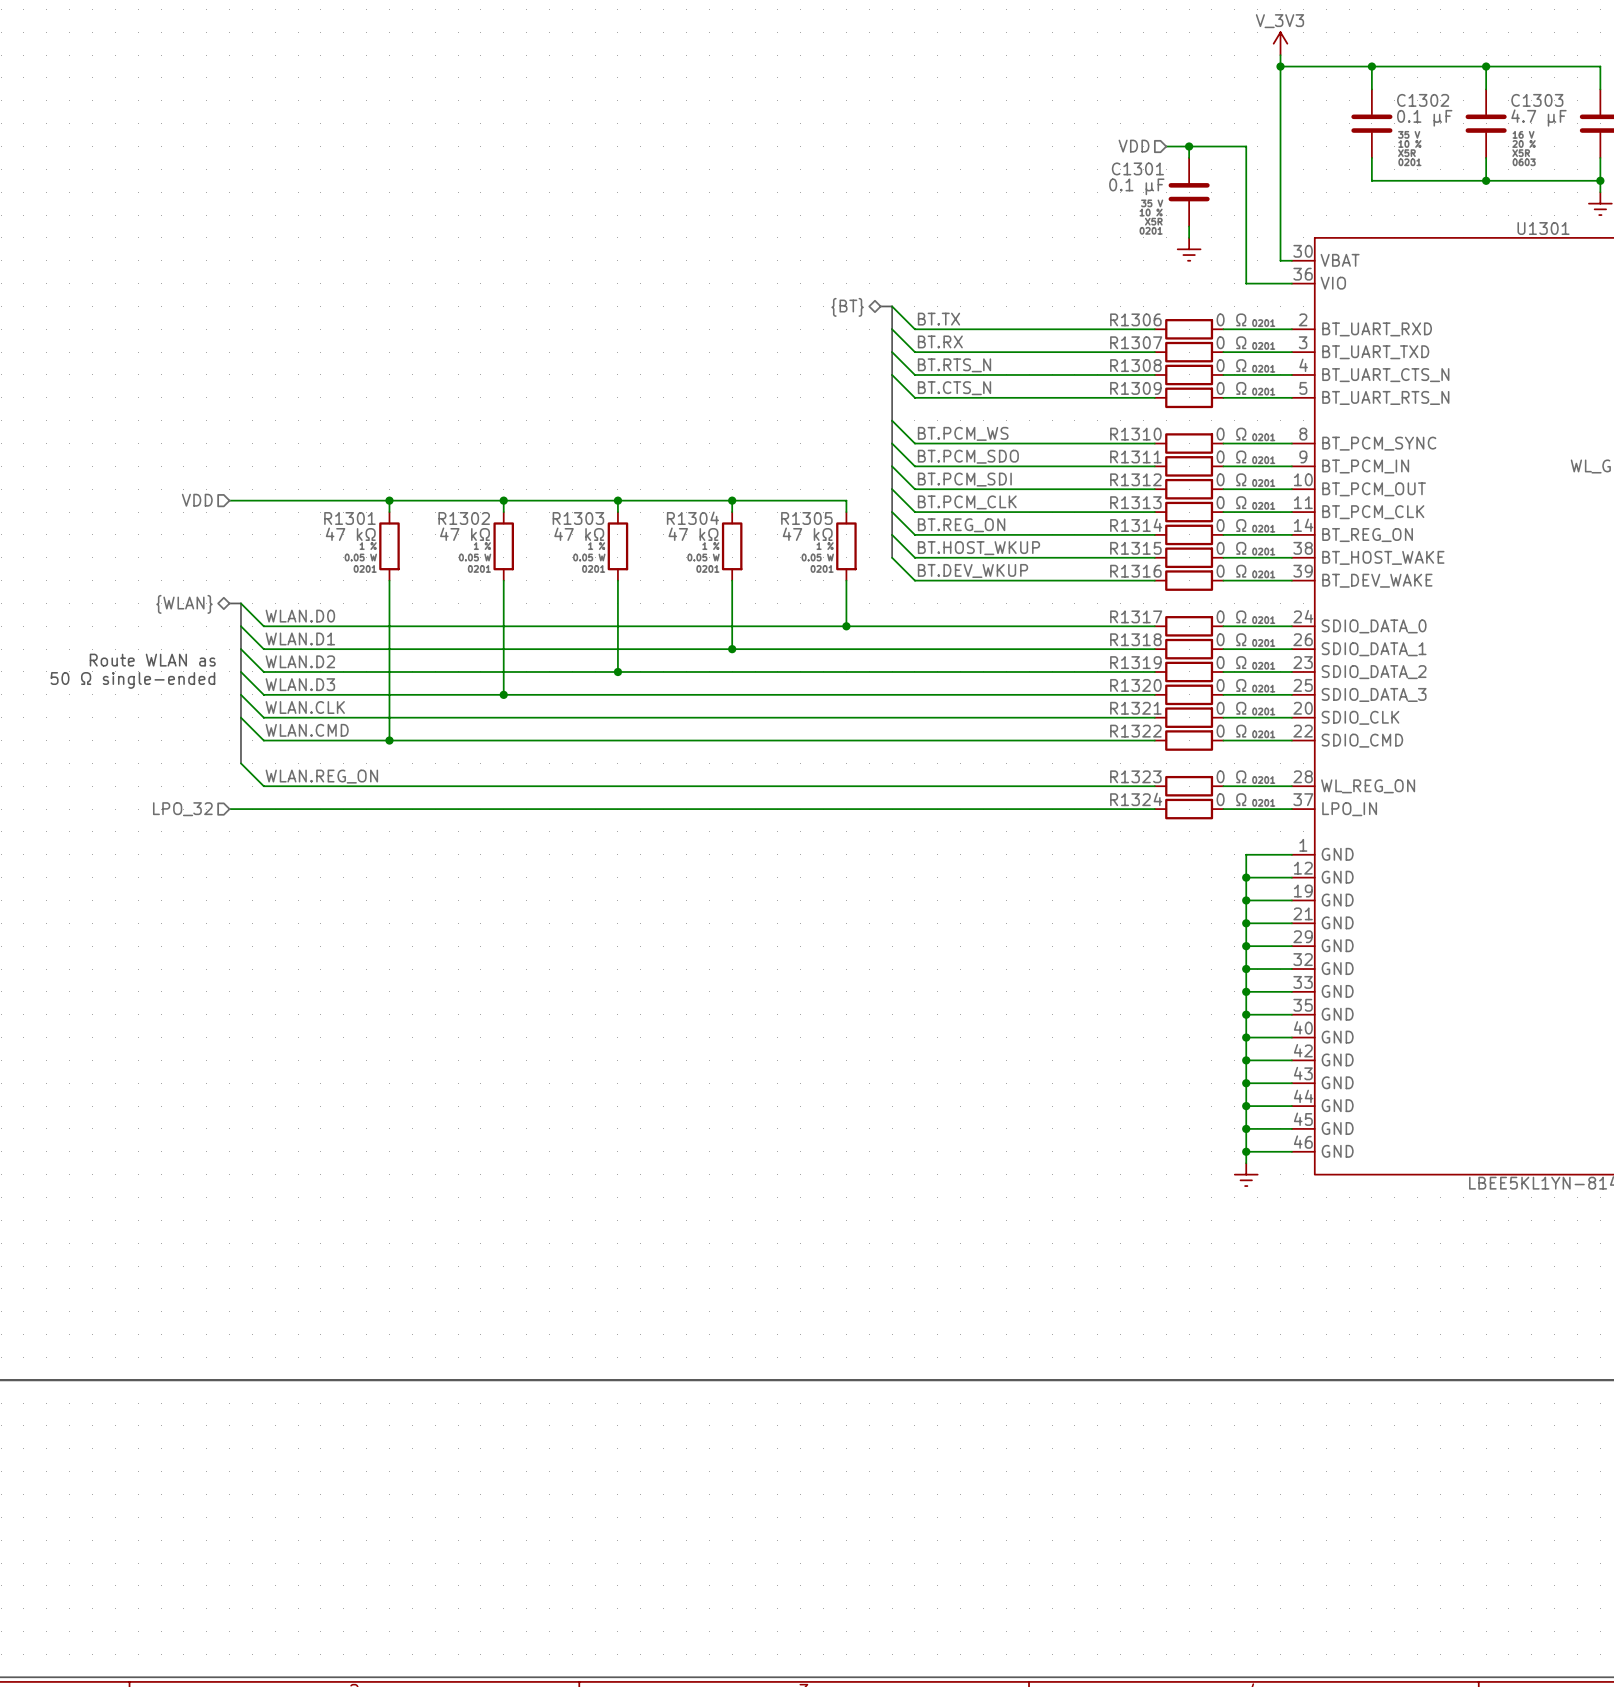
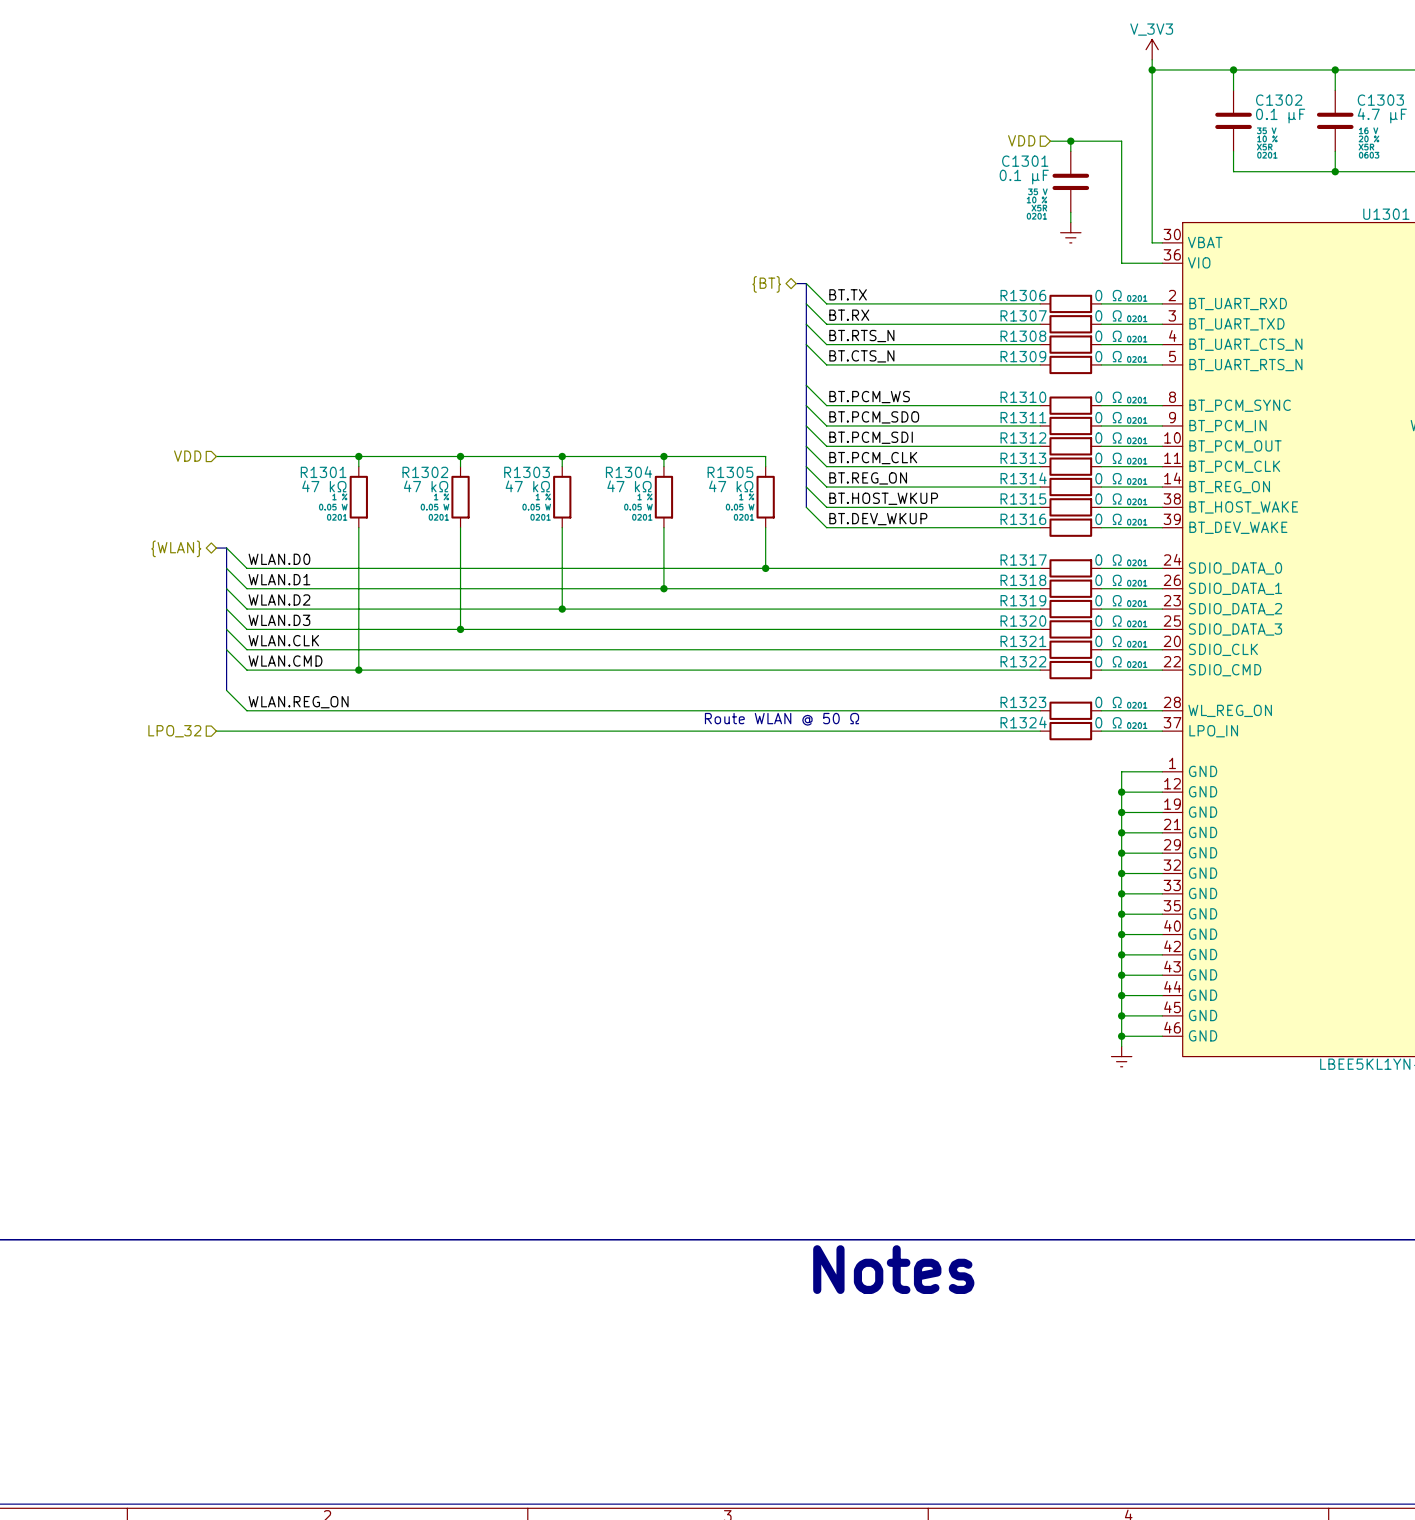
text: Route WLAN as (152, 660) -> none
text: 50 Ω single-ended (132, 680) -> none
text: none -> Route WLAN @ 50 Ω (782, 719)
text: none -> Notes (893, 1269)

